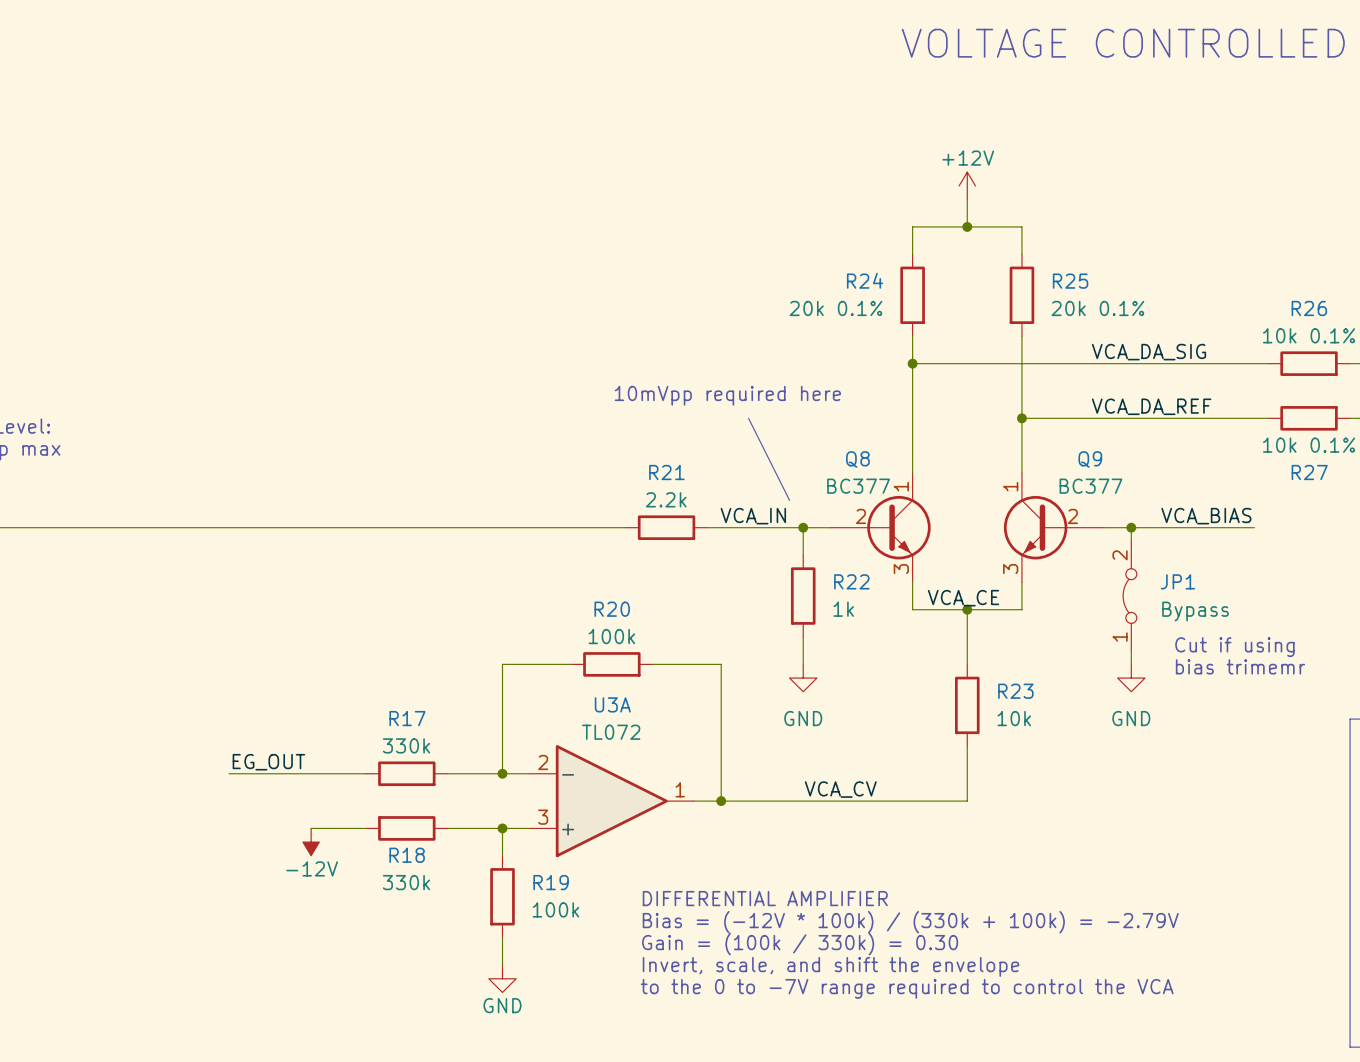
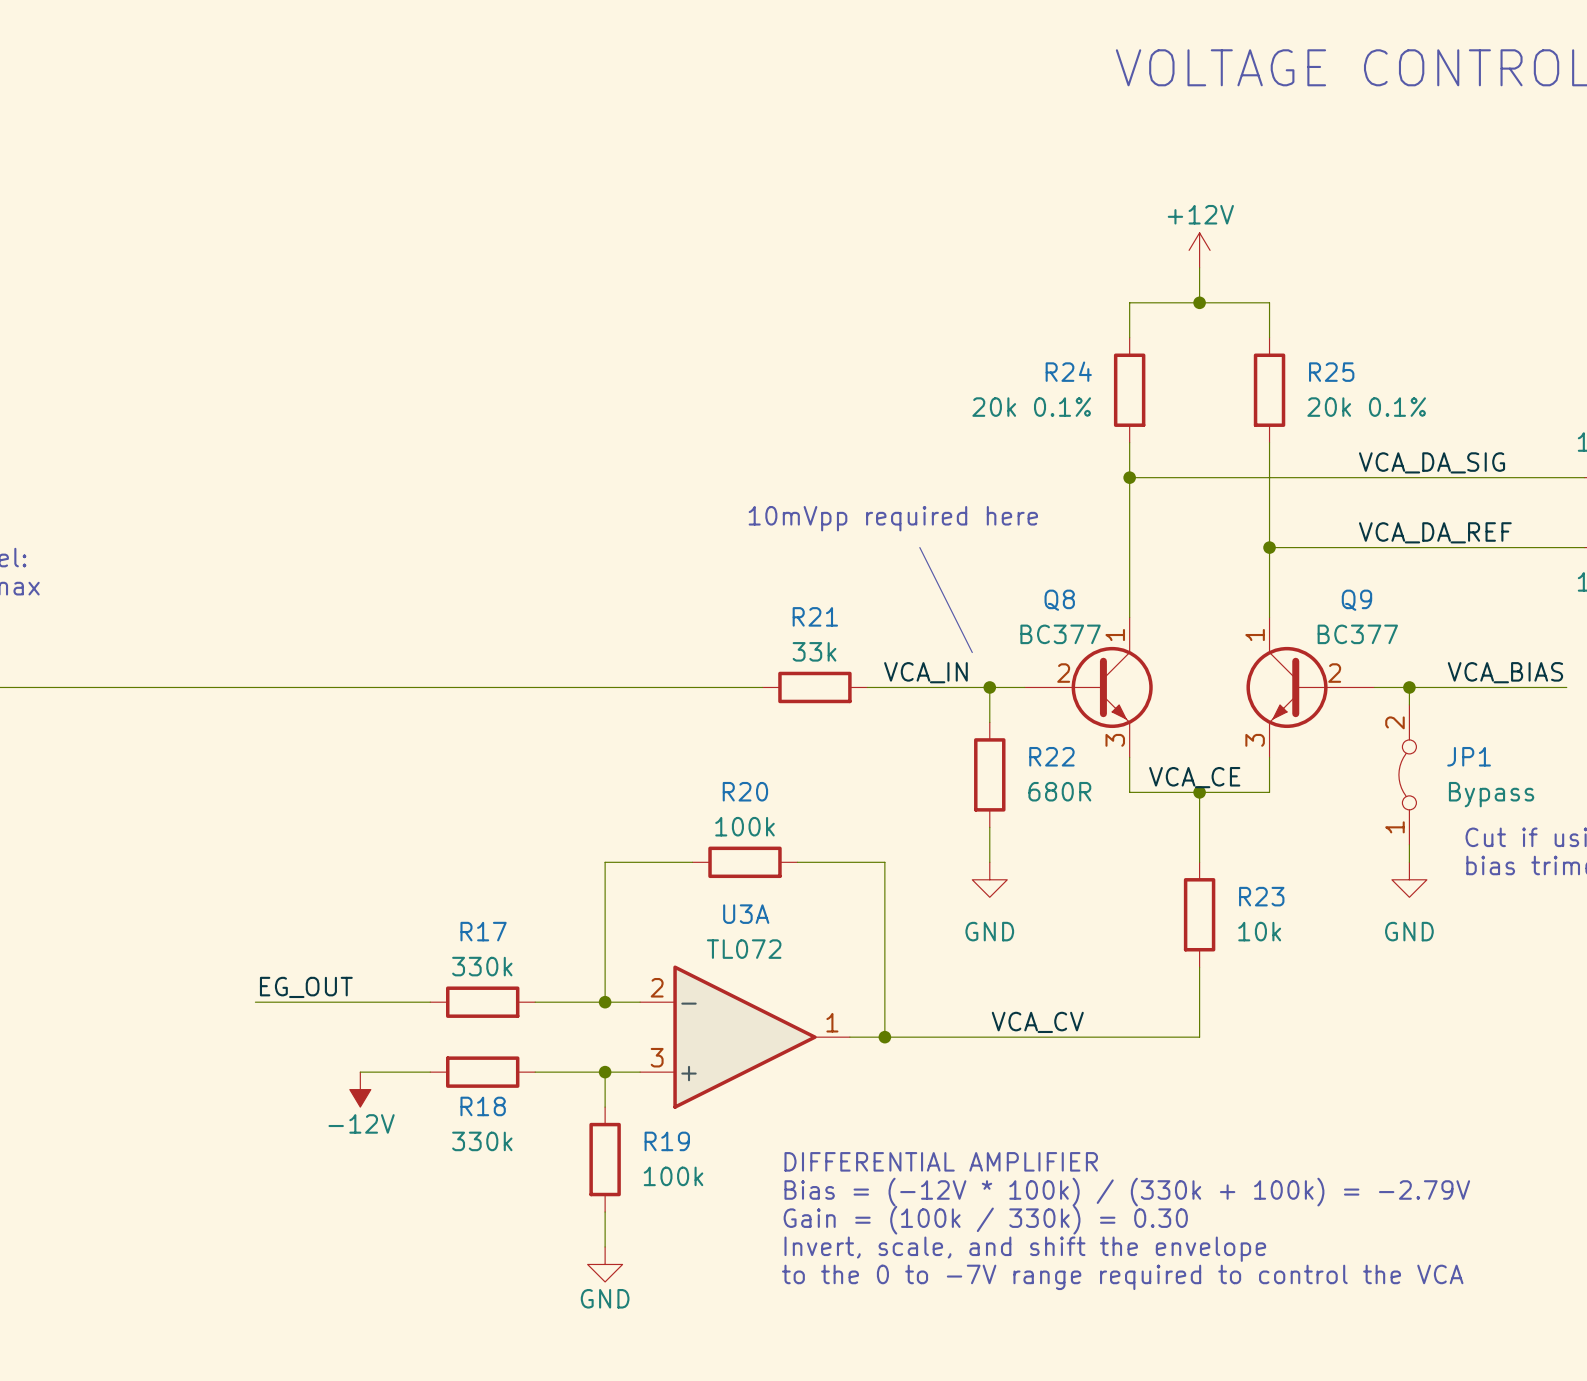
R21 value: 2.2k (666, 499) -> 33k (814, 651)
R22 value: 1k (843, 609) -> 680R (1059, 791)

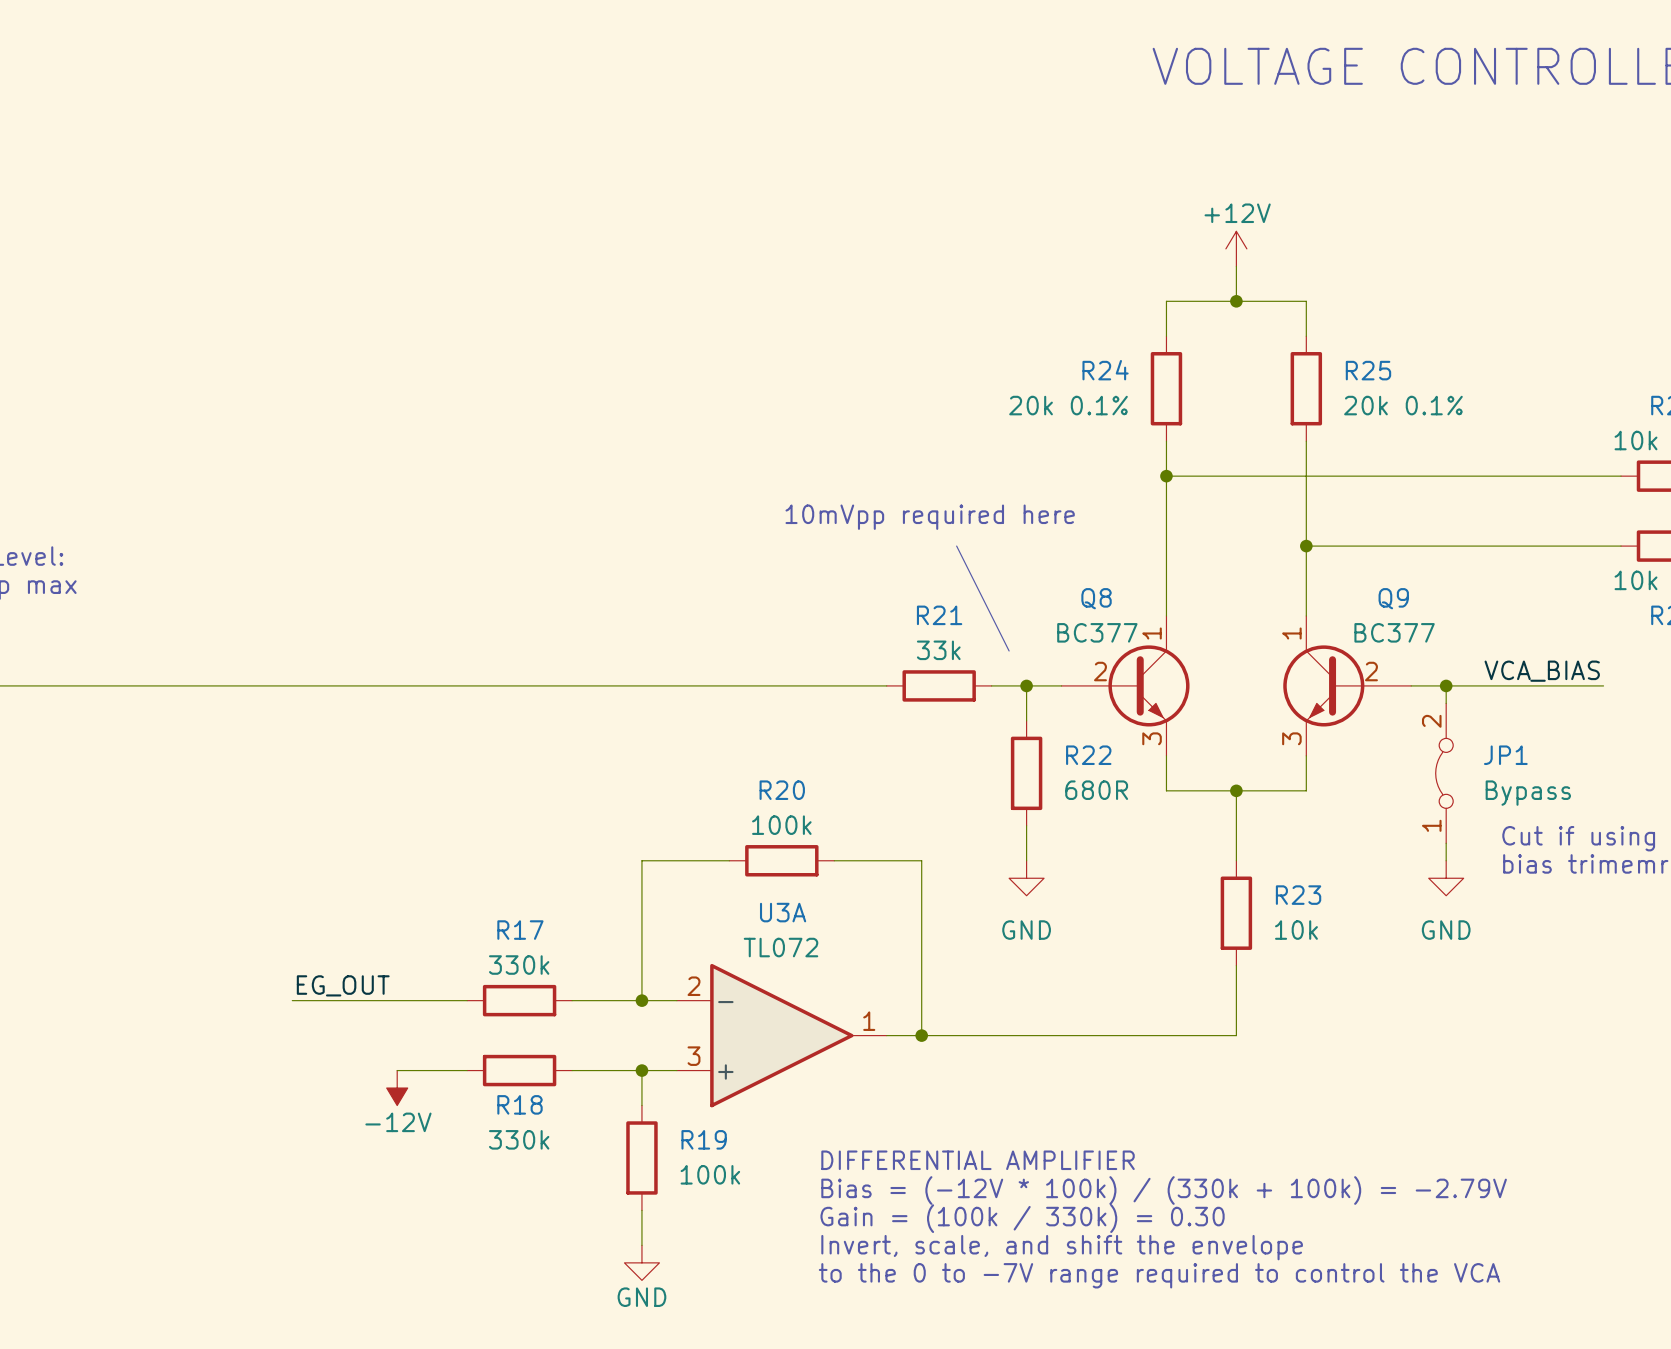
label: VCA_DA_SIG (1432, 462) -> none
label: VCA_DA_REF (1435, 532) -> none
label: VCA_IN (925, 672) -> none
R21 position: (814, 687) -> (939, 685)
wire: (867, 687) (954, 687) -> (799, 685) (886, 685)
label: VCA_CE (1194, 777) -> none
label: VCA_CV (1037, 1022) -> none

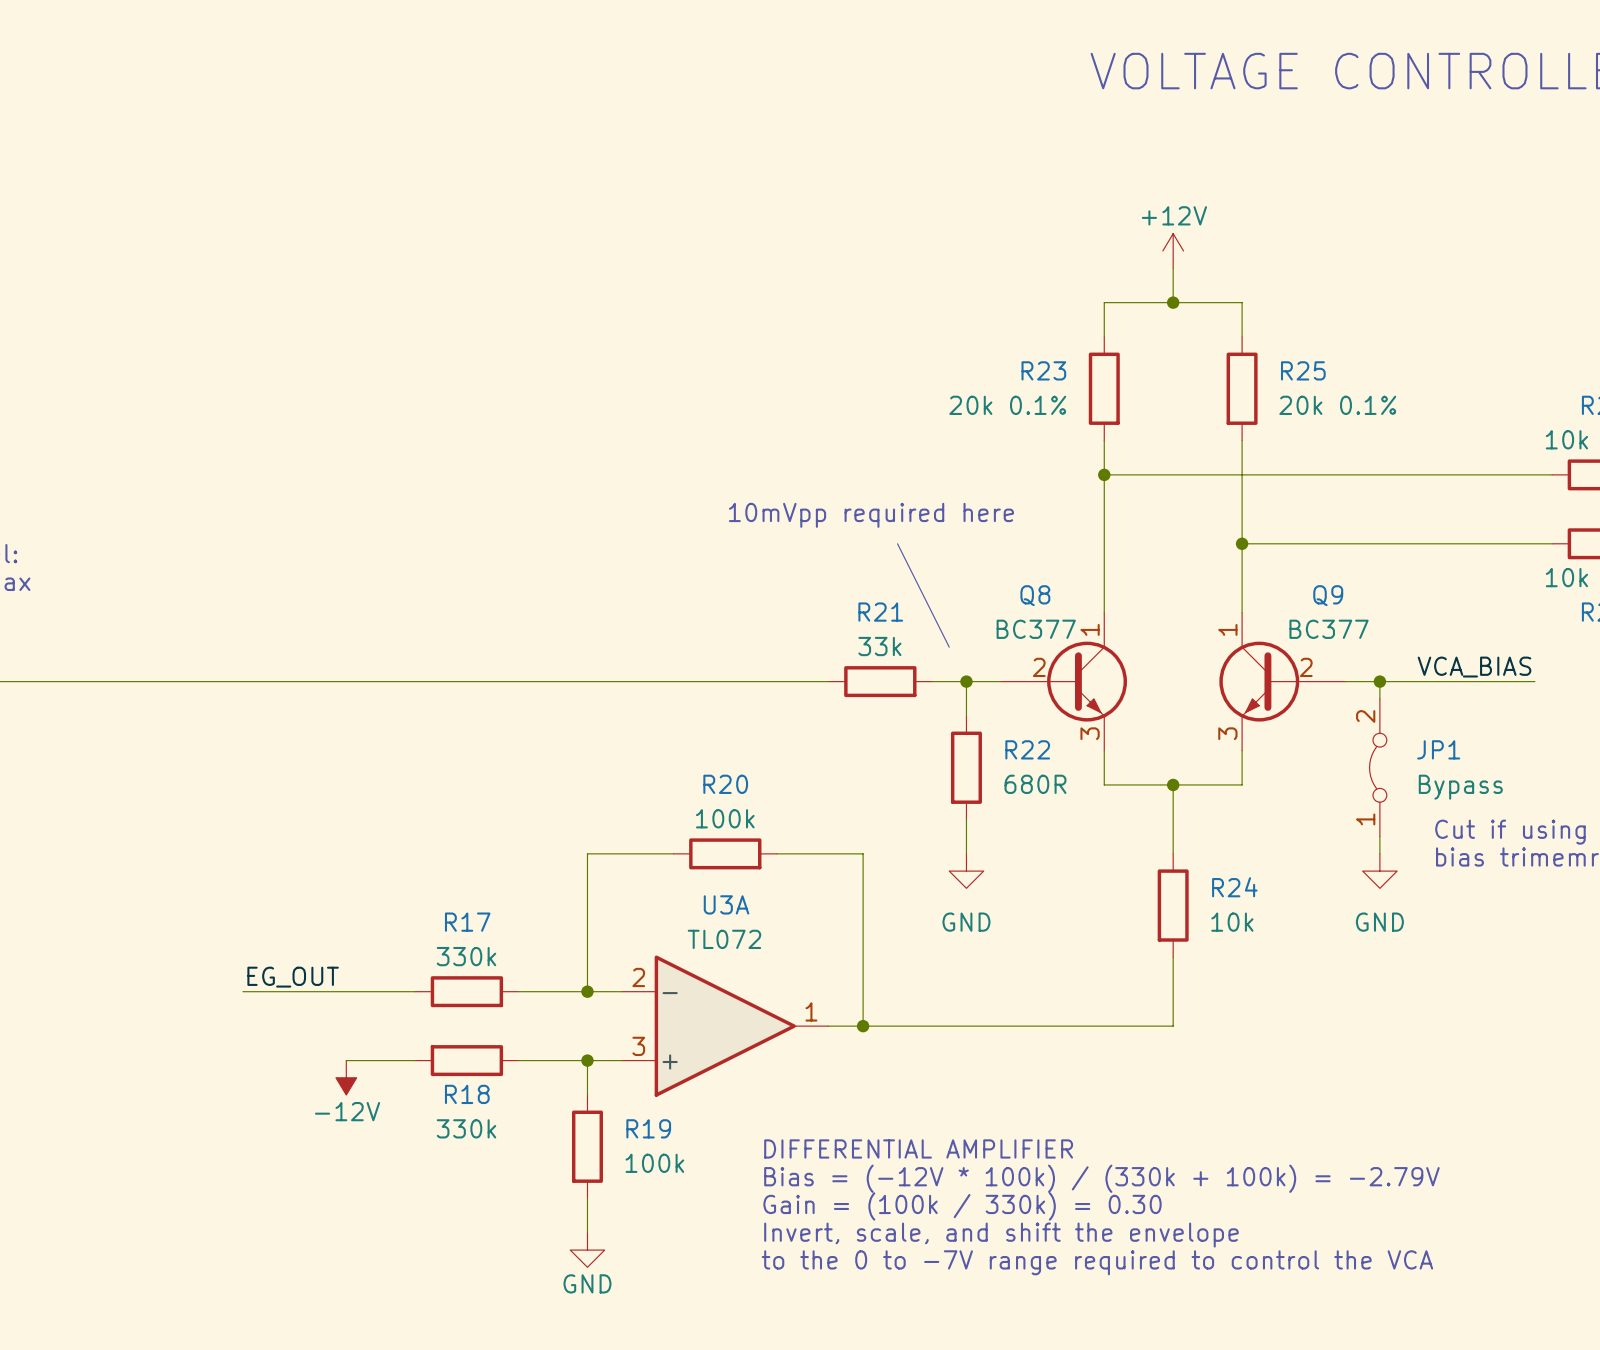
R24 name: R24 (1105, 370) -> R23 (1043, 370)
R23 name: R23 (1298, 895) -> R24 (1234, 887)

